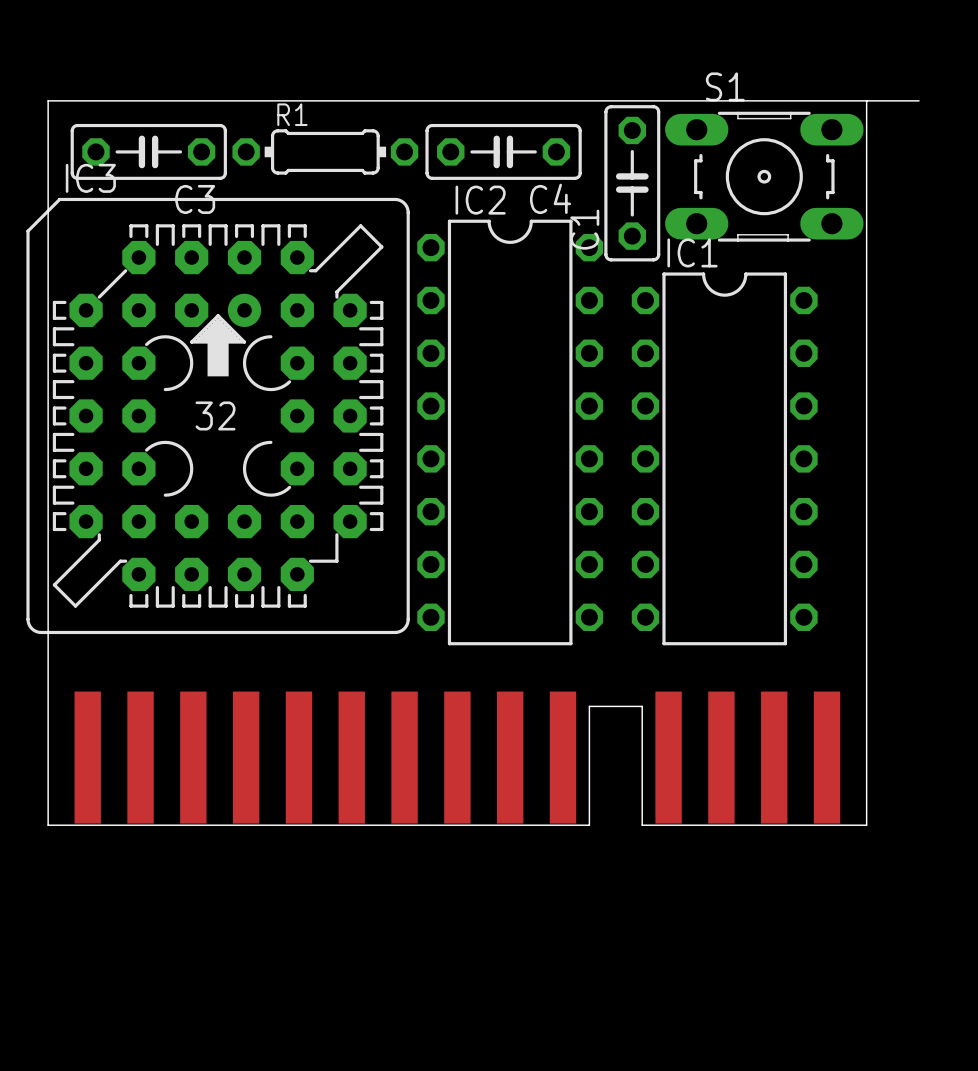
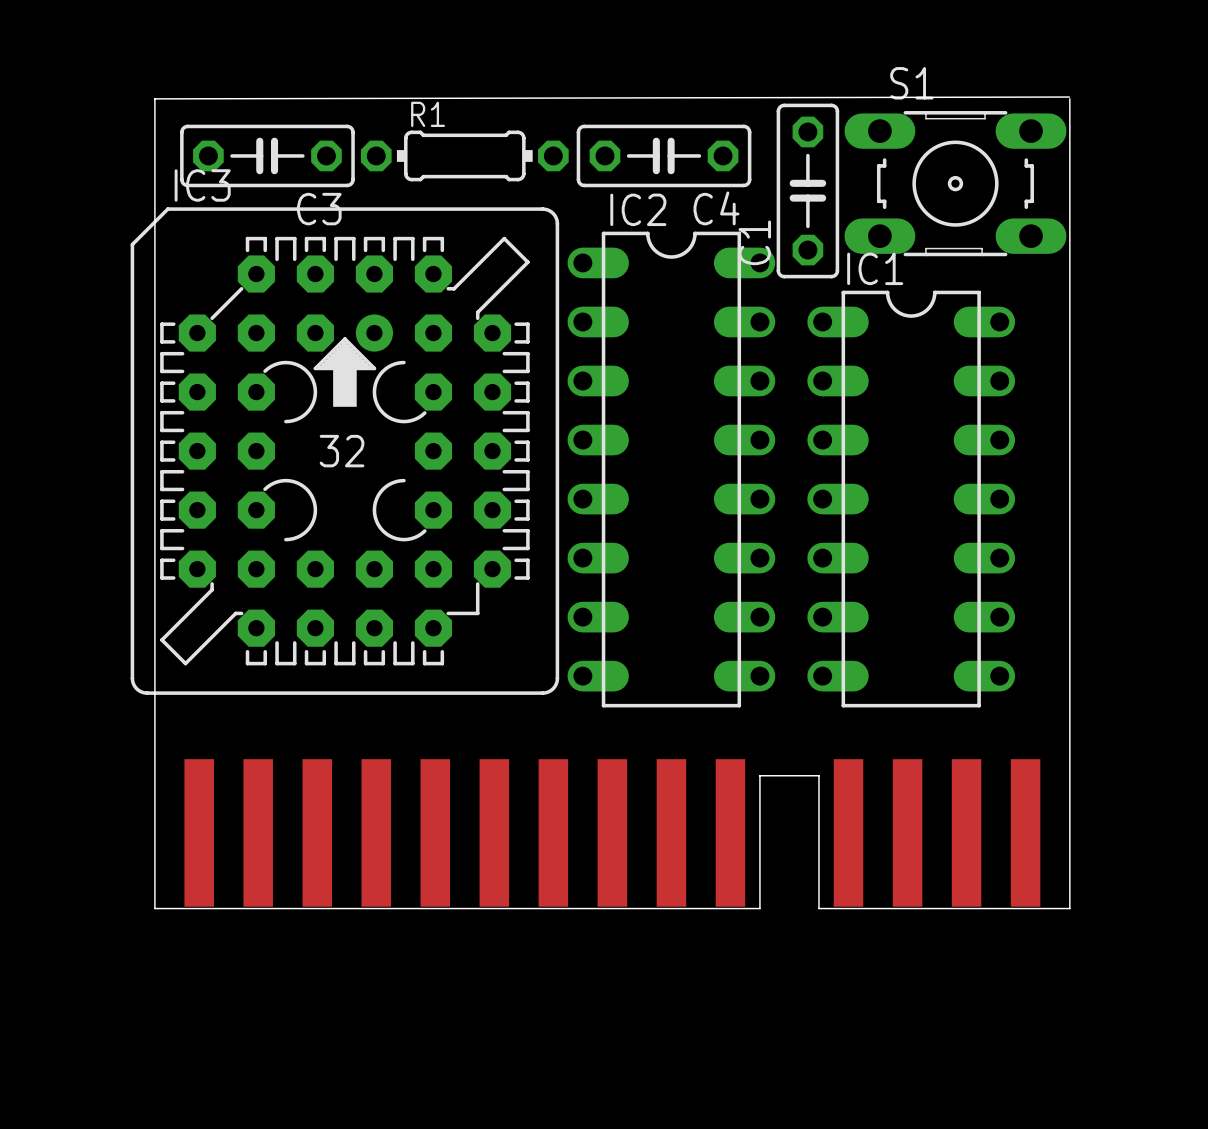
board edge: (48, 100) (919, 100) -> (154, 98) (1069, 97)
IC2 footprint: [417, 219, 604, 646] -> [567, 231, 776, 708]
IC1 footprint: [631, 272, 818, 646] -> [807, 290, 1016, 708]

